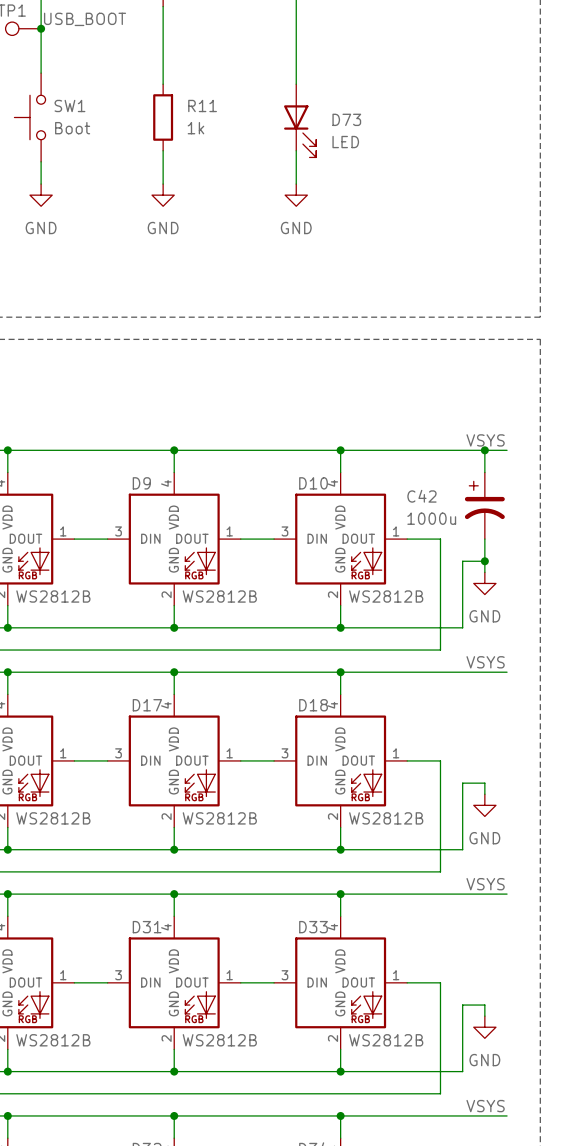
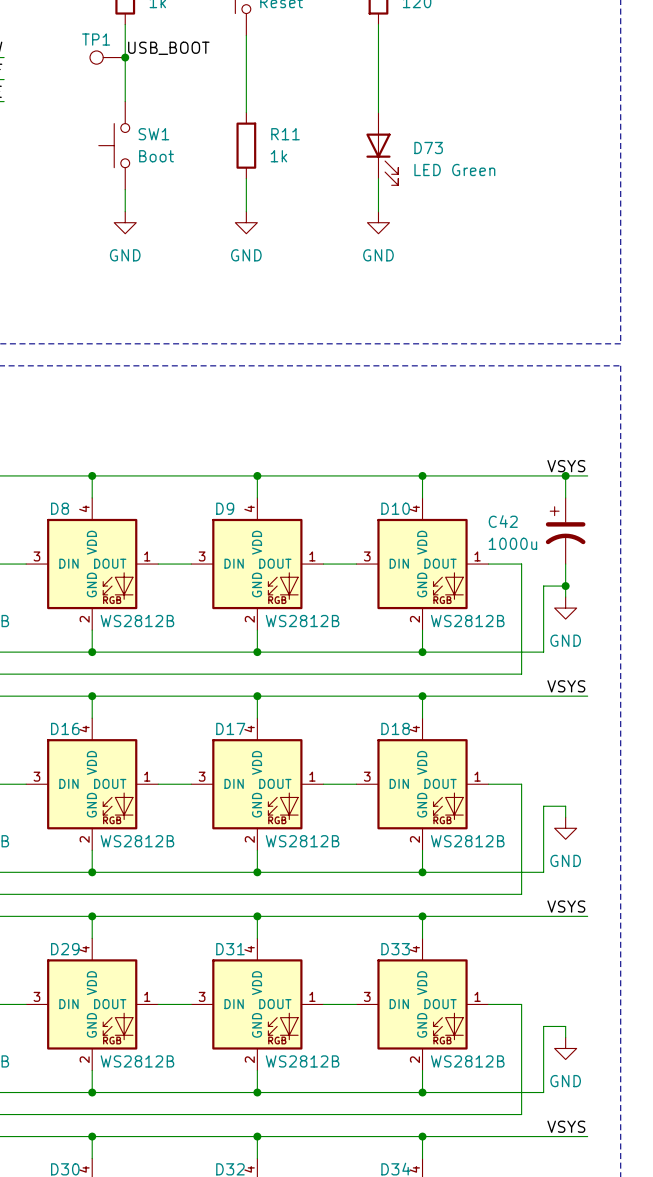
D73 value: LED (345, 142) -> LED Green (454, 170)

